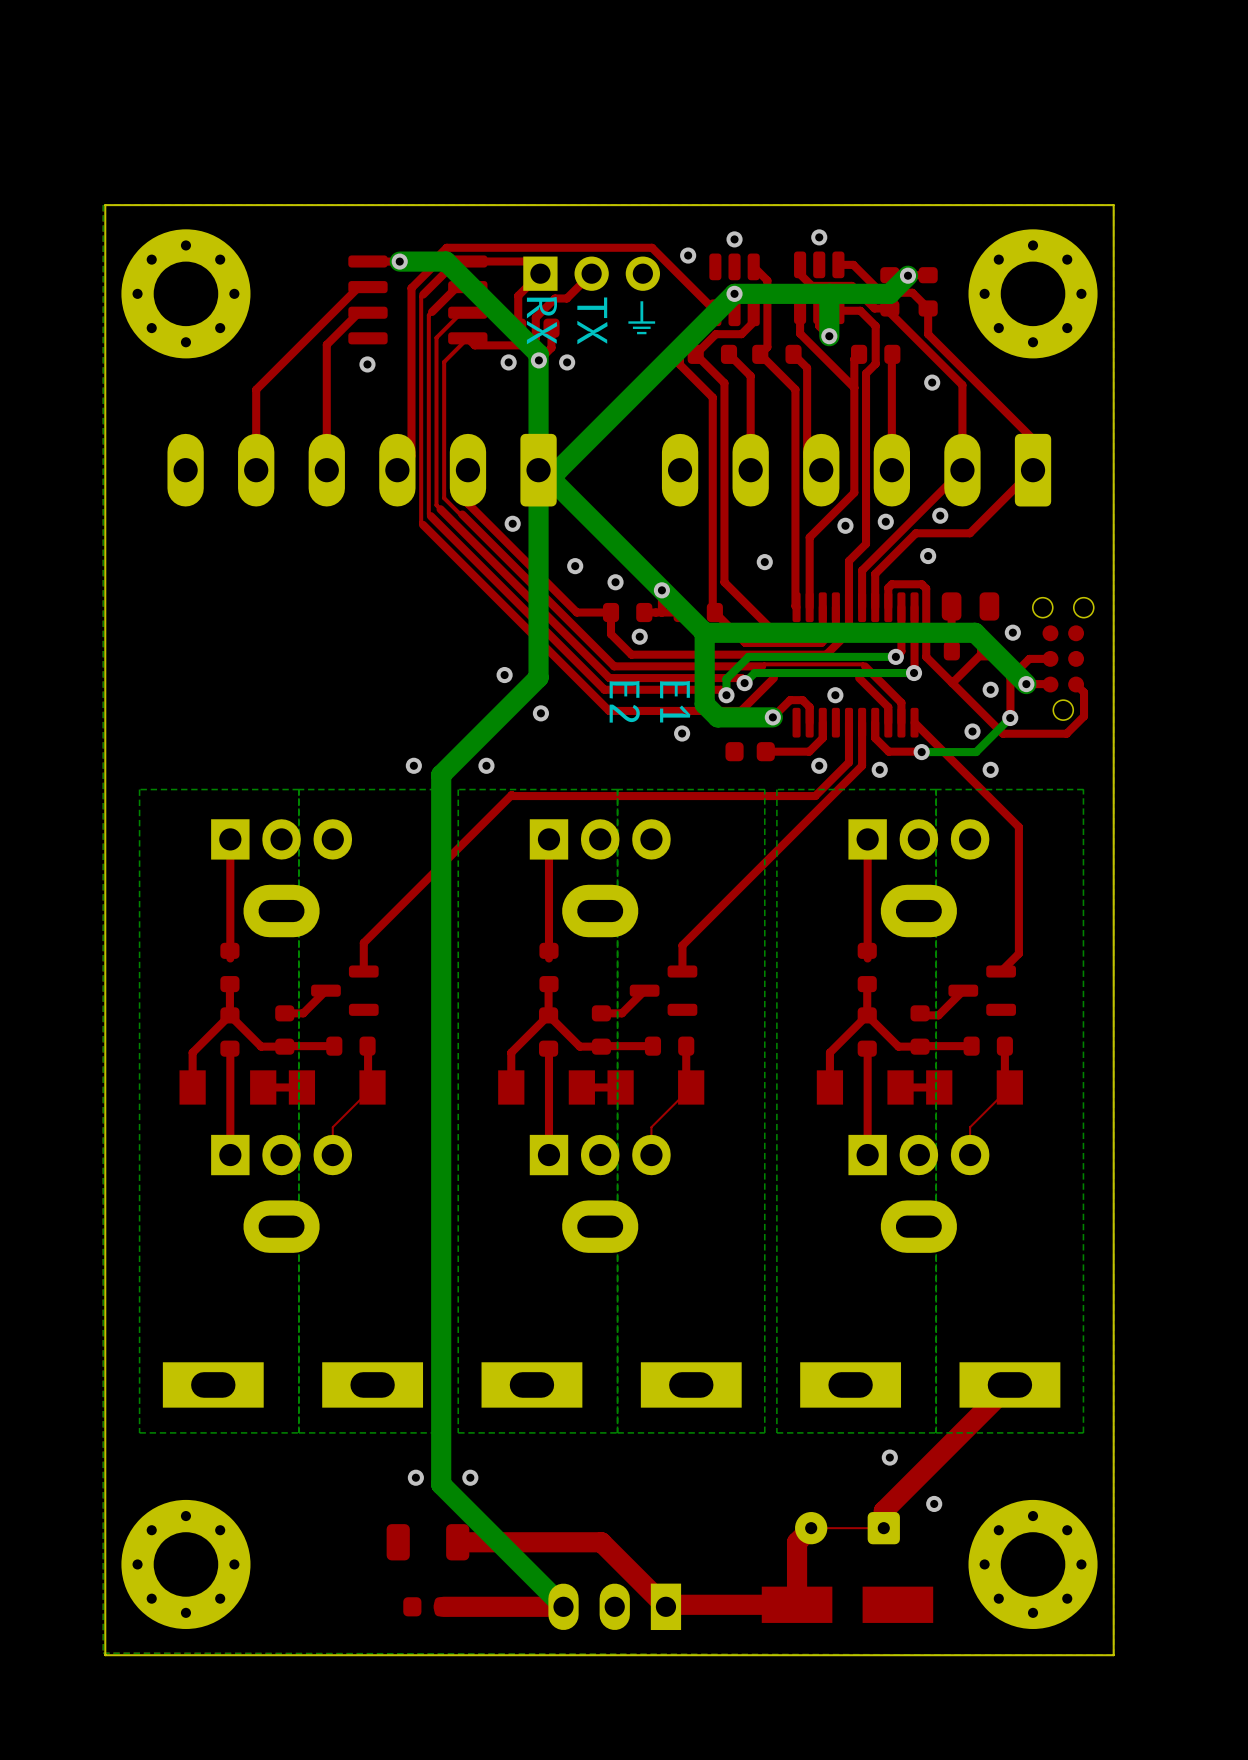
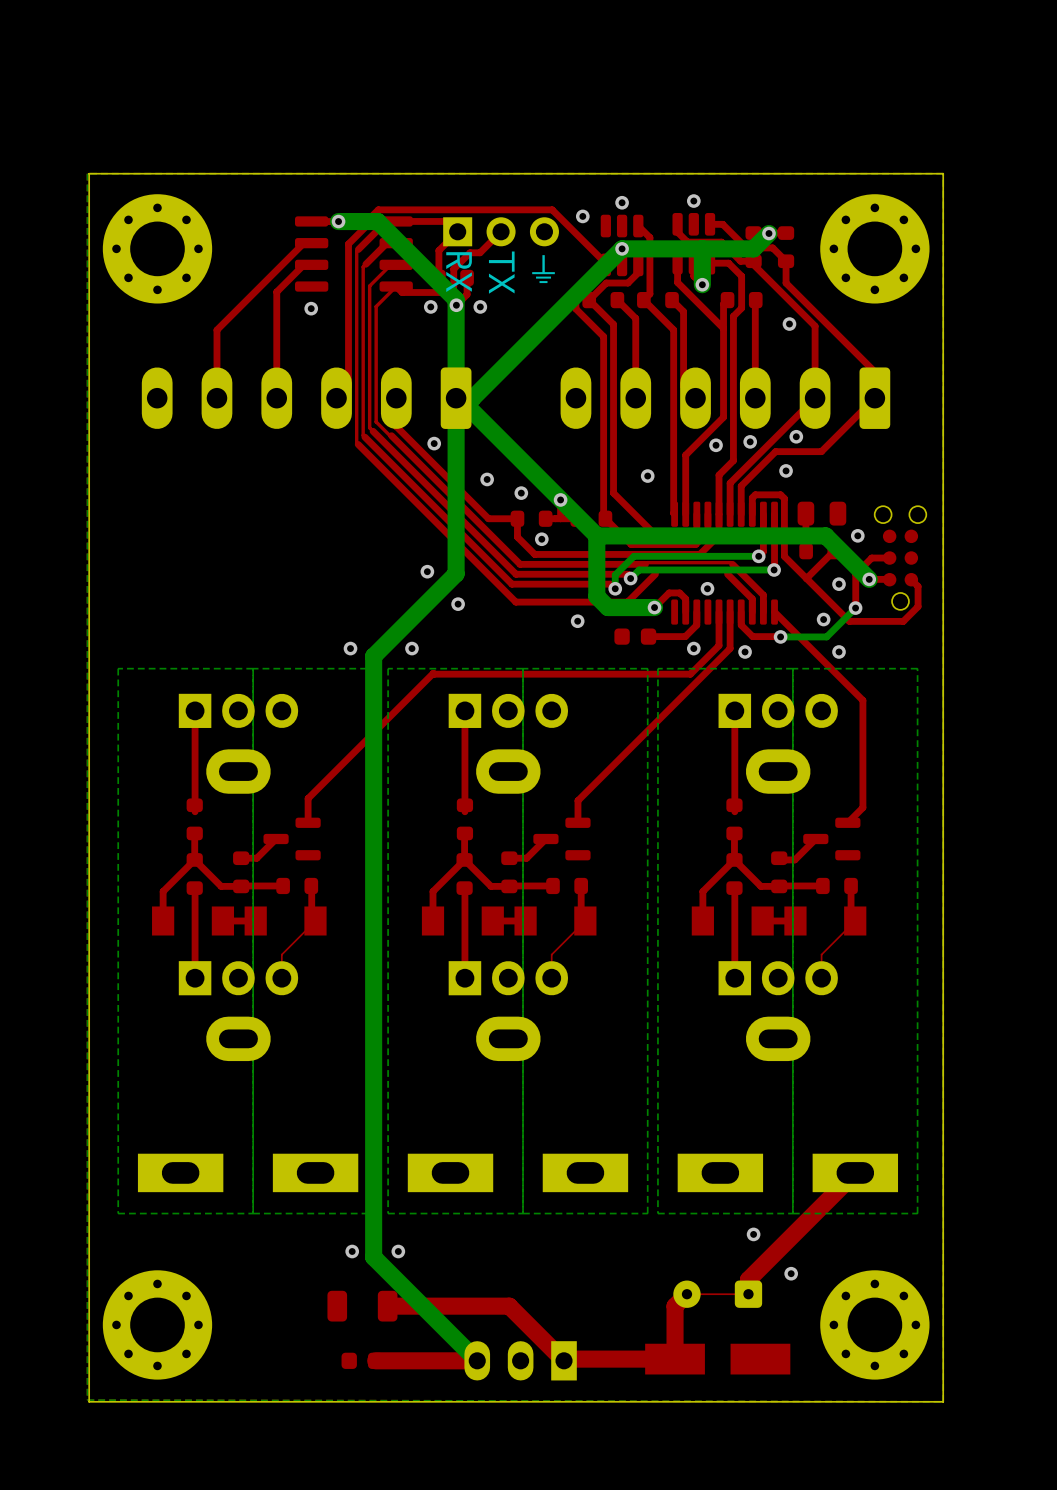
text: E2 (624, 701) -> none
text: E1 (675, 701) -> none

